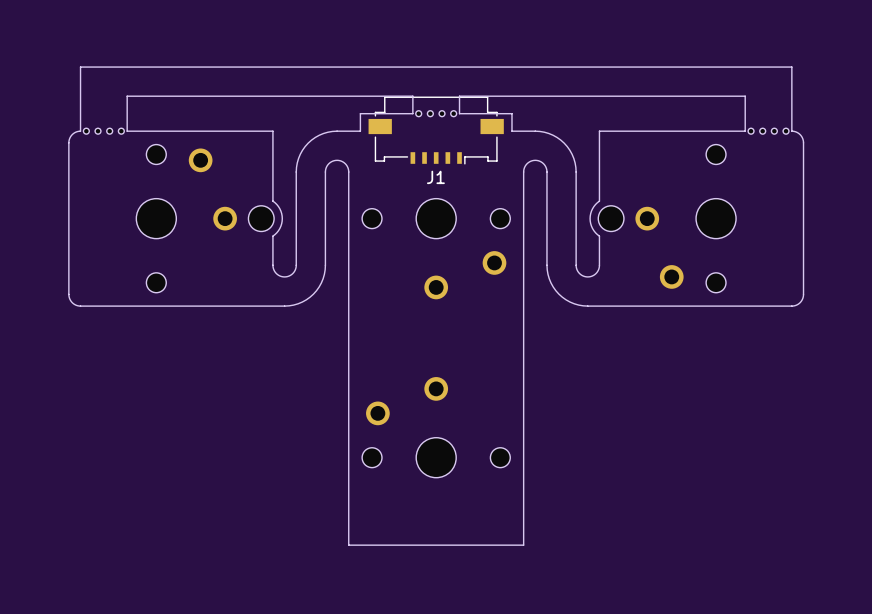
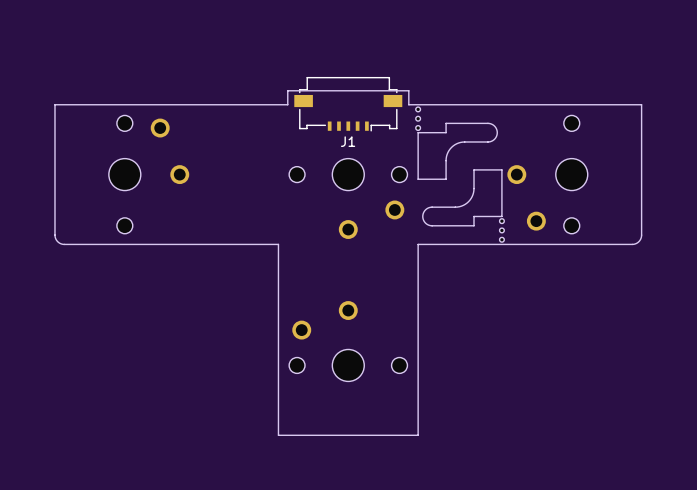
board edge: (412, 113) (412, 96) (127, 96) (127, 131) -> (54, 114) (54, 104) (101, 104)
part: (418, 113) -> none
part: (430, 113) -> none
part: (442, 113) -> none
part: (453, 113) -> none
board edge: (459, 113) (459, 96) (745, 96) (745, 131) -> (366, 90) (329, 90)
part: (86, 131) -> none
part: (98, 131) -> none
part: (109, 131) -> none
part: (121, 131) -> none
board edge: (337, 131) (323, 133) (311, 140) (305, 146) (298, 158) (296, 172) (296, 266) (291, 274) (284, 276) (277, 274) (273, 266) (272, 236) (279, 228) (282, 218) (279, 208) (272, 201) (272, 131) -> (269, 104) (217, 104)
board edge: (599, 131) (599, 201) (592, 208) (590, 218) (592, 228) (599, 236) (599, 266) (594, 274) (587, 276) (580, 274) (576, 266) (576, 172) (573, 158) (567, 146) (560, 140) (548, 133) (535, 131) -> (478, 104) (427, 104)
part: (751, 131) -> none
part: (762, 131) -> none
part: (774, 131) -> none
part: (786, 131) -> none
part: none -> (418, 109)
board edge: (803, 142) (800, 134) (791, 131) (791, 67) (80, 67) (80, 131) (72, 134) (68, 142) -> (641, 114) (641, 104) (595, 104)
part: none -> (418, 118)
part: none -> (418, 128)
board edge: (523, 172) (526, 164) (533, 160) (542, 162) (546, 168) (546, 265) (551, 282) (558, 294) (566, 299) (574, 303) (587, 306) -> (418, 137) (418, 132) (446, 132) (446, 123) (489, 123) (494, 126) (497, 131) (496, 137) (491, 141) (462, 142) (451, 147) (446, 156) (446, 179) (418, 179)
board edge: none -> (501, 169) (473, 169) (473, 192) (468, 201) (457, 207) (428, 207) (423, 212) (424, 221) (430, 225) (473, 225) (473, 216) (501, 216) (501, 169)
part: (261, 218) -> none
part: (611, 218) -> none
board edge: (523, 224) (523, 306) -> (469, 244) (418, 244)
part: none -> (501, 221)
part: none -> (501, 230)
part: none -> (501, 239)
board edge: (348, 306) (348, 170) (344, 162) (337, 160) (329, 162) (325, 170) (325, 265) (323, 278) (316, 290) (310, 297) (298, 303) (284, 306) -> (278, 244) (227, 244)

